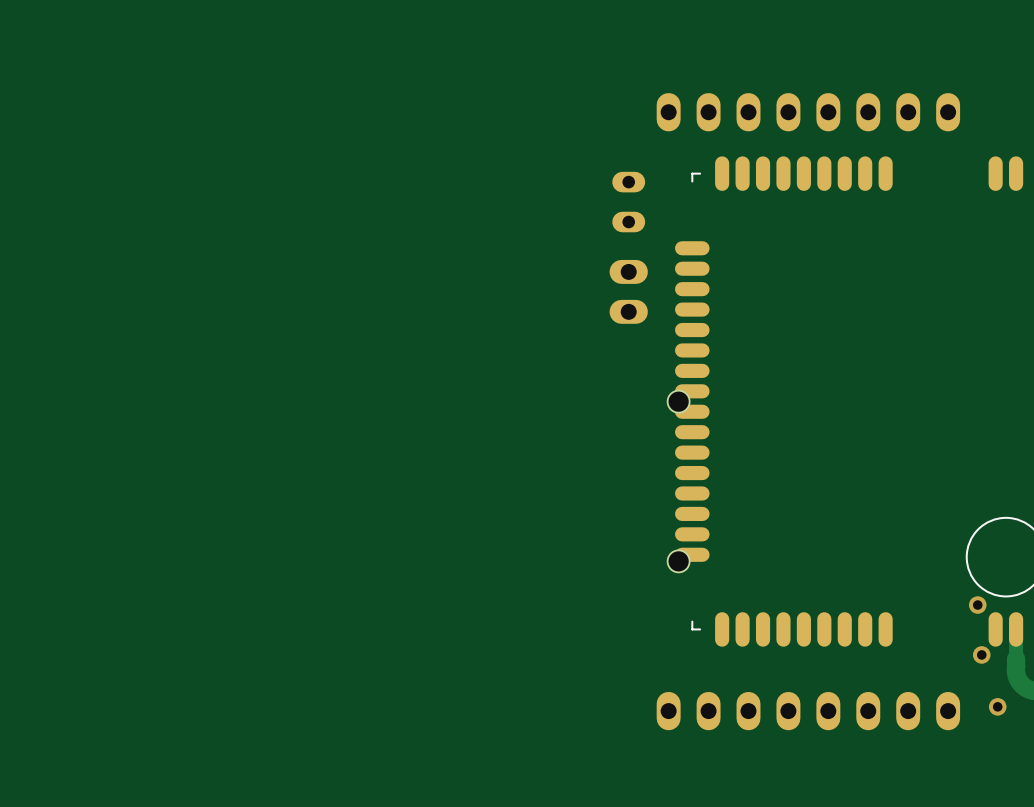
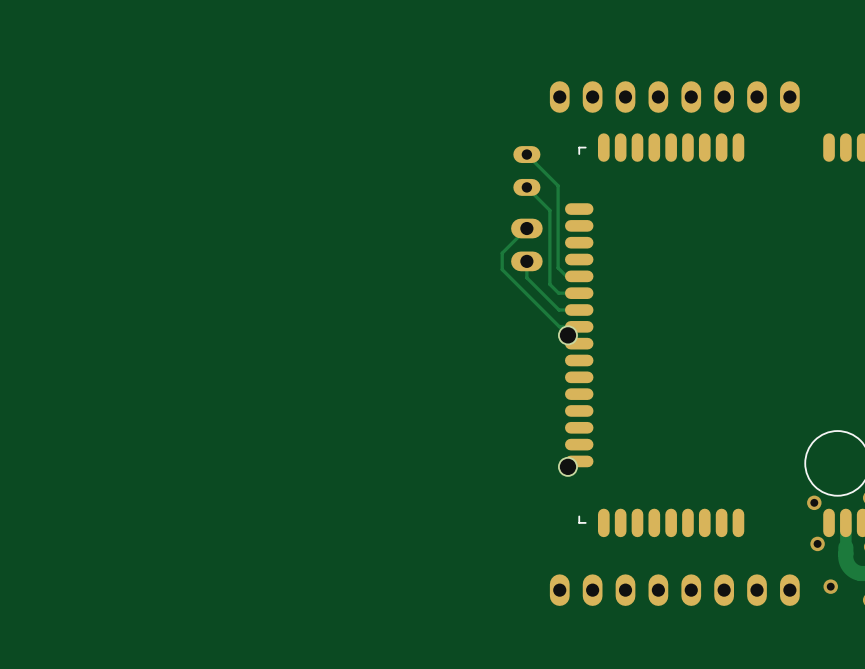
track: none -> (526, 154) (558, 185) (558, 267) (566, 276) (579, 276)
track: none -> (526, 187) (549, 210) (549, 284) (558, 293) (579, 293)
track: none -> (526, 228) (502, 253) (502, 269) (559, 326) (579, 326)
track: none -> (526, 261) (526, 277) (559, 310) (579, 310)

